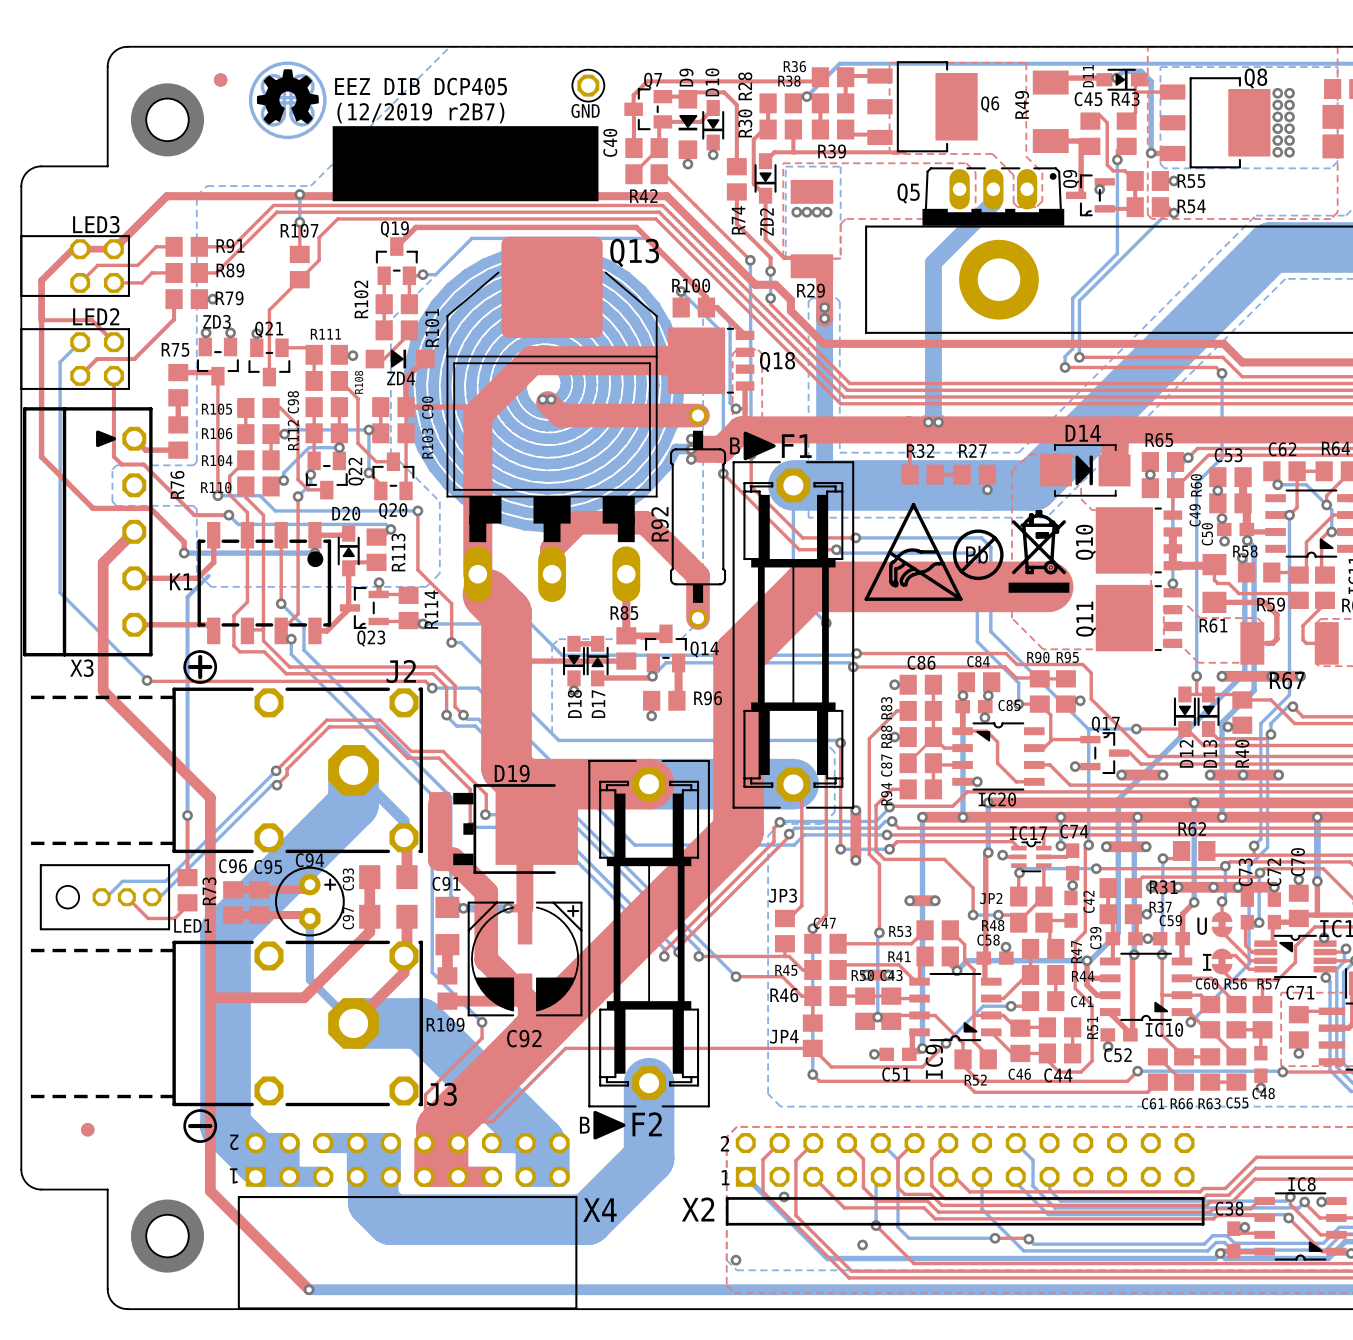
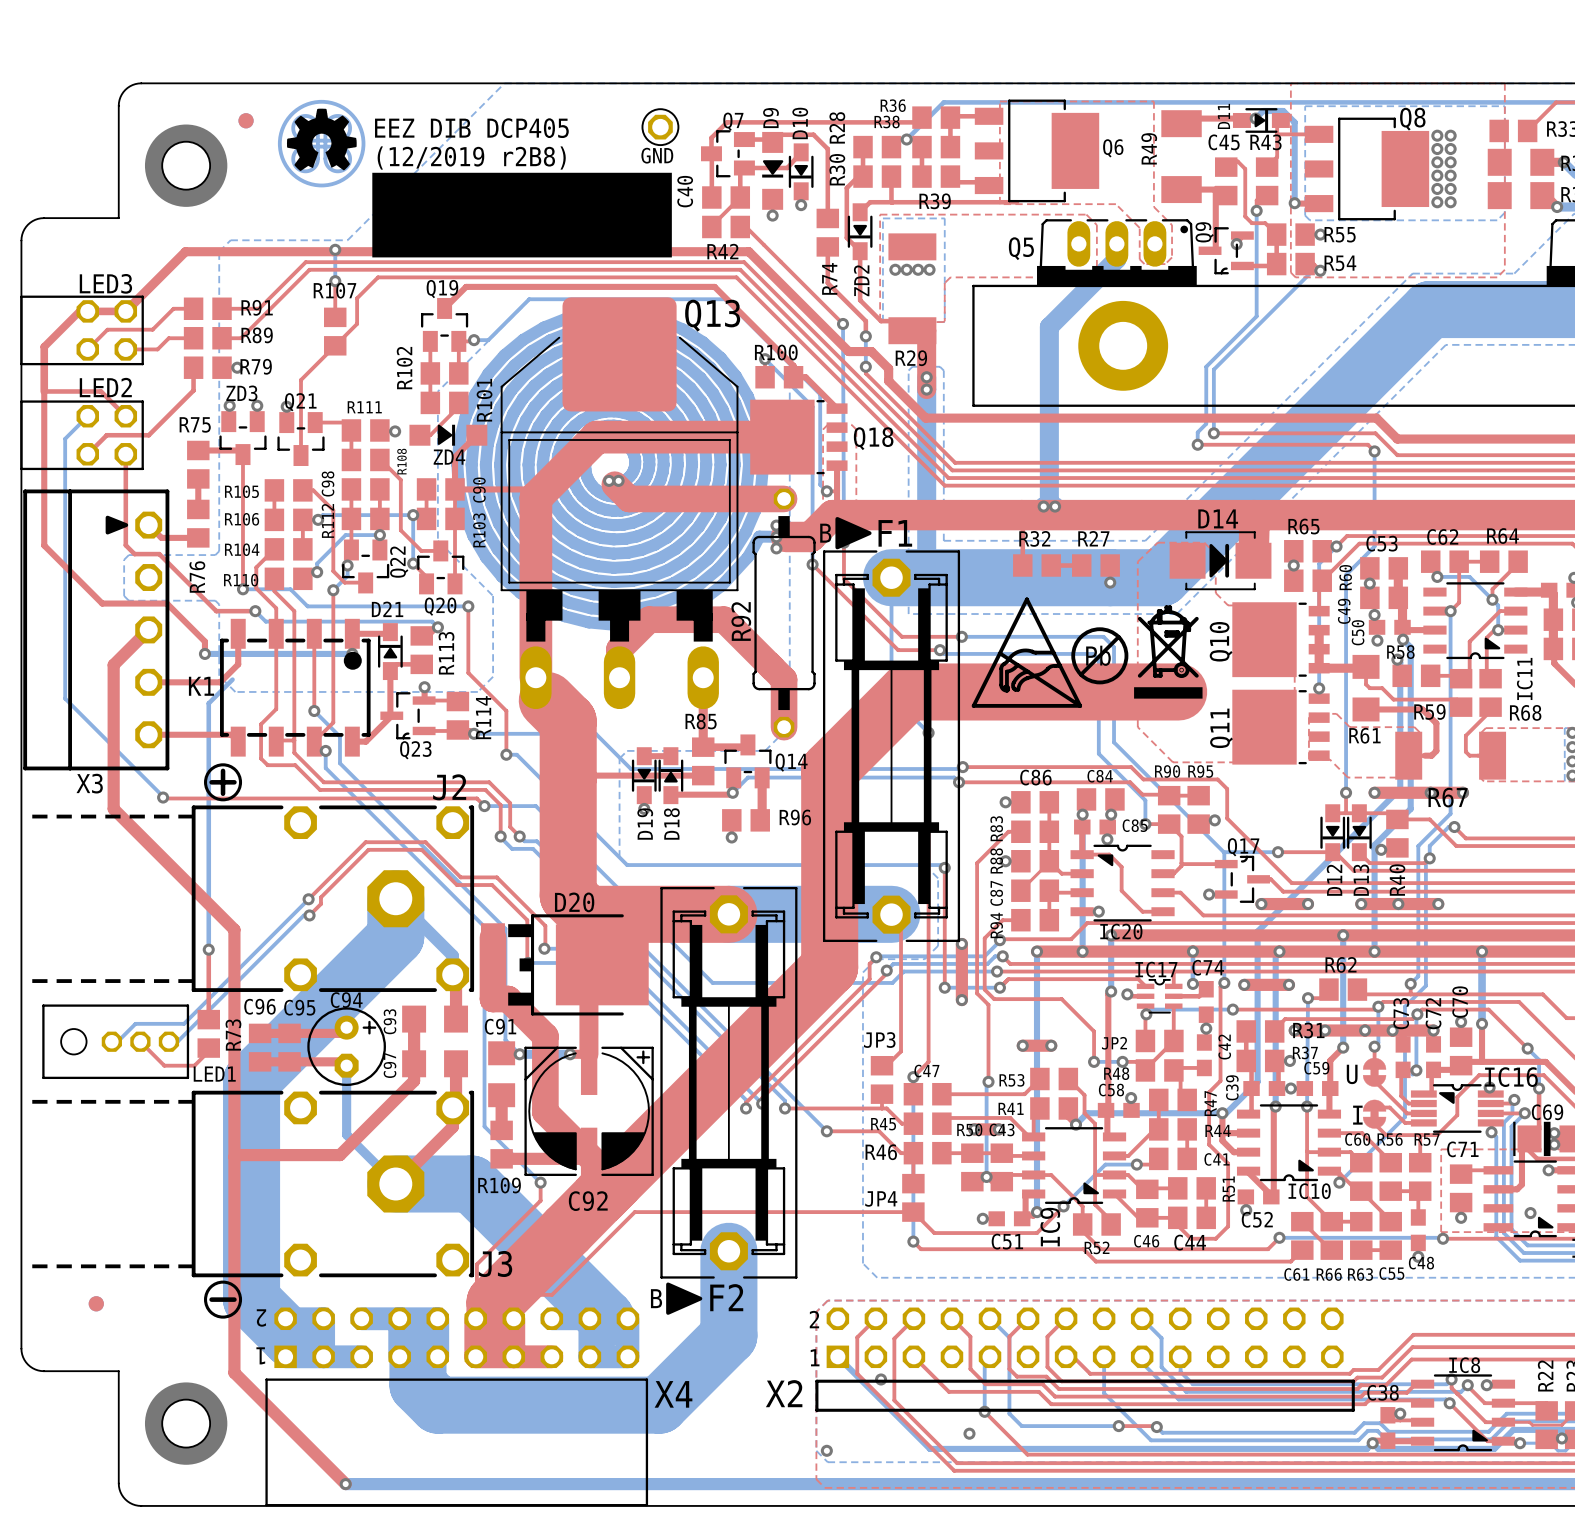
text: (12/2019 r2B7) (420, 113) -> (12/2019 r2B8) (471, 158)
D20 name: D20 (346, 513) -> D21 (387, 609)
D18 name: D18 (574, 703) -> D19 (645, 824)
D17 name: D17 (598, 704) -> D18 (671, 823)
D19 name: D19 (512, 773) -> D20 (574, 902)

